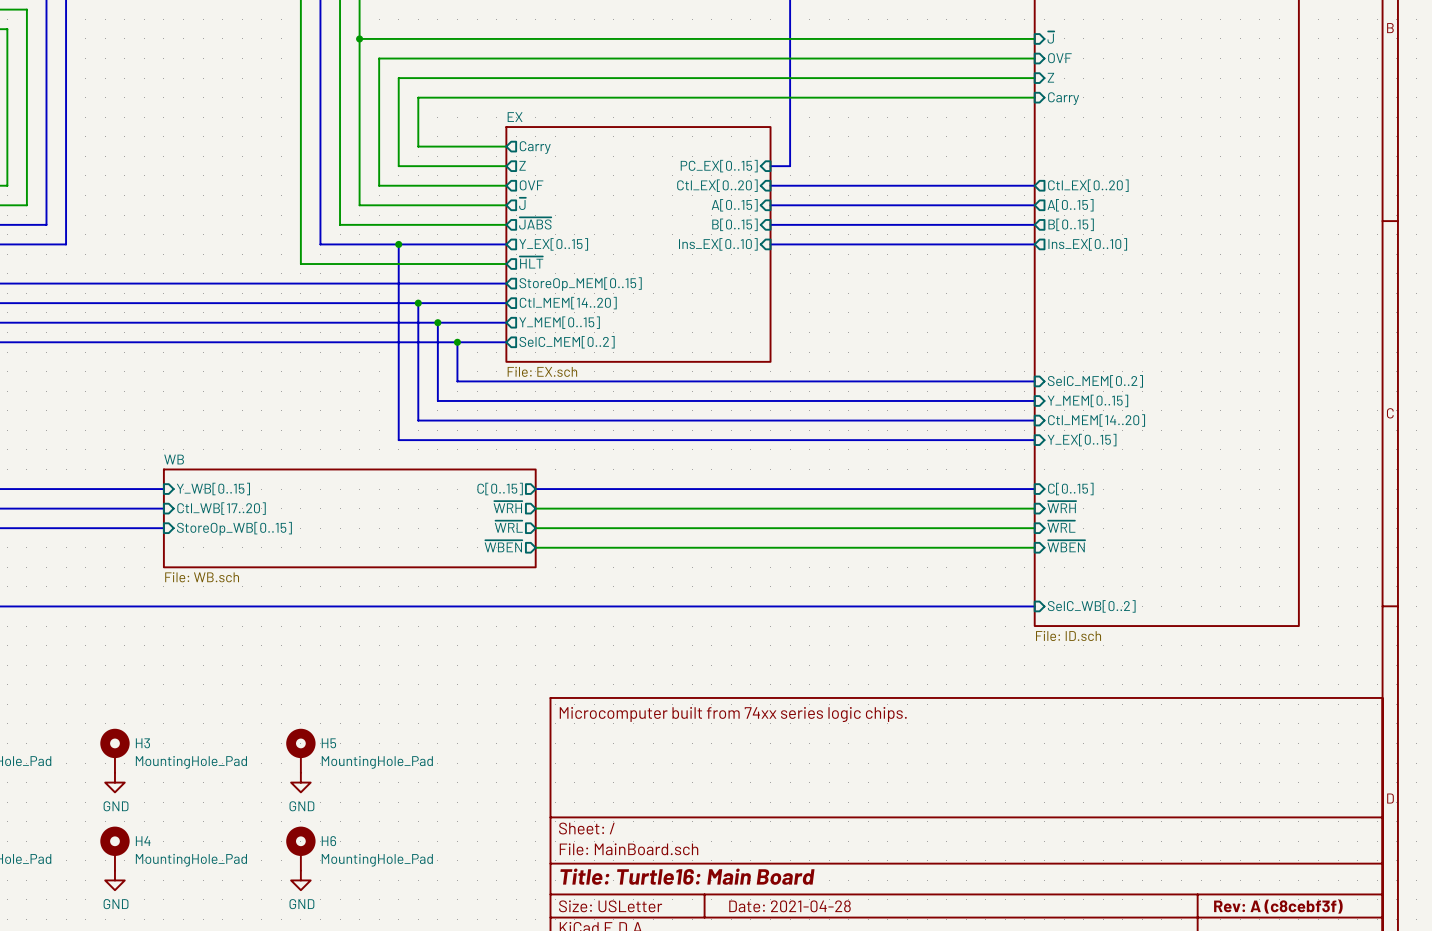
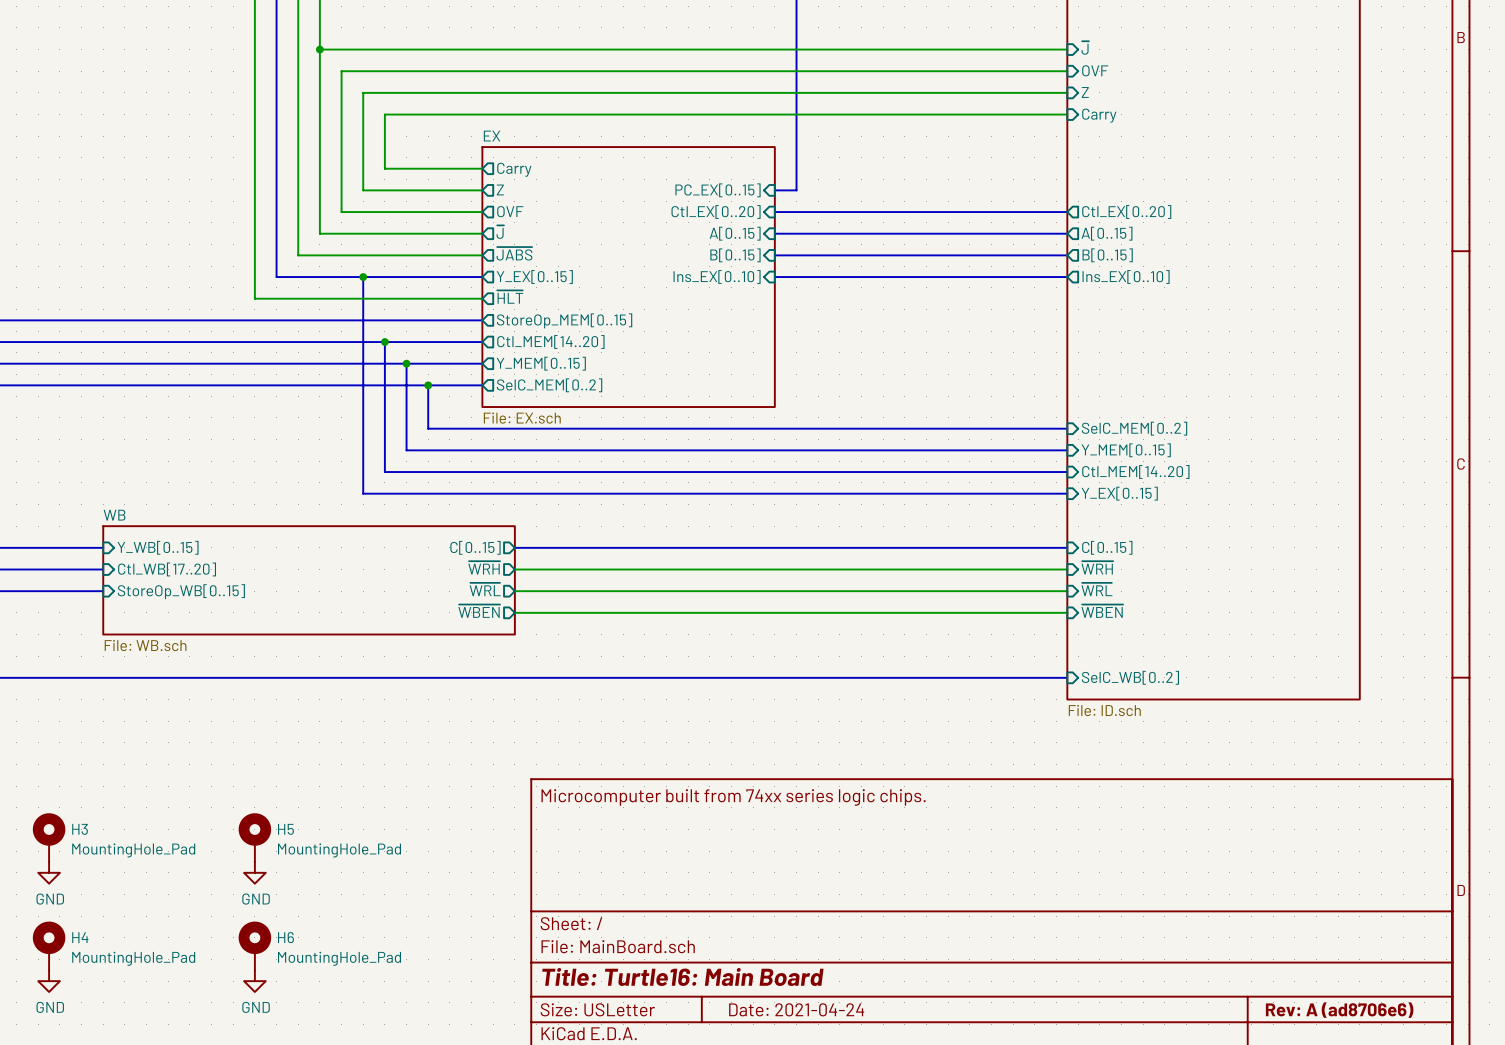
title block: Date: 2021-04-28 (789, 906) -> Date: 2021-04-24 (796, 1009)
title block: Rev: A (c8cebf3f) (1278, 906) -> Rev: A (ad8706e6) (1339, 1010)

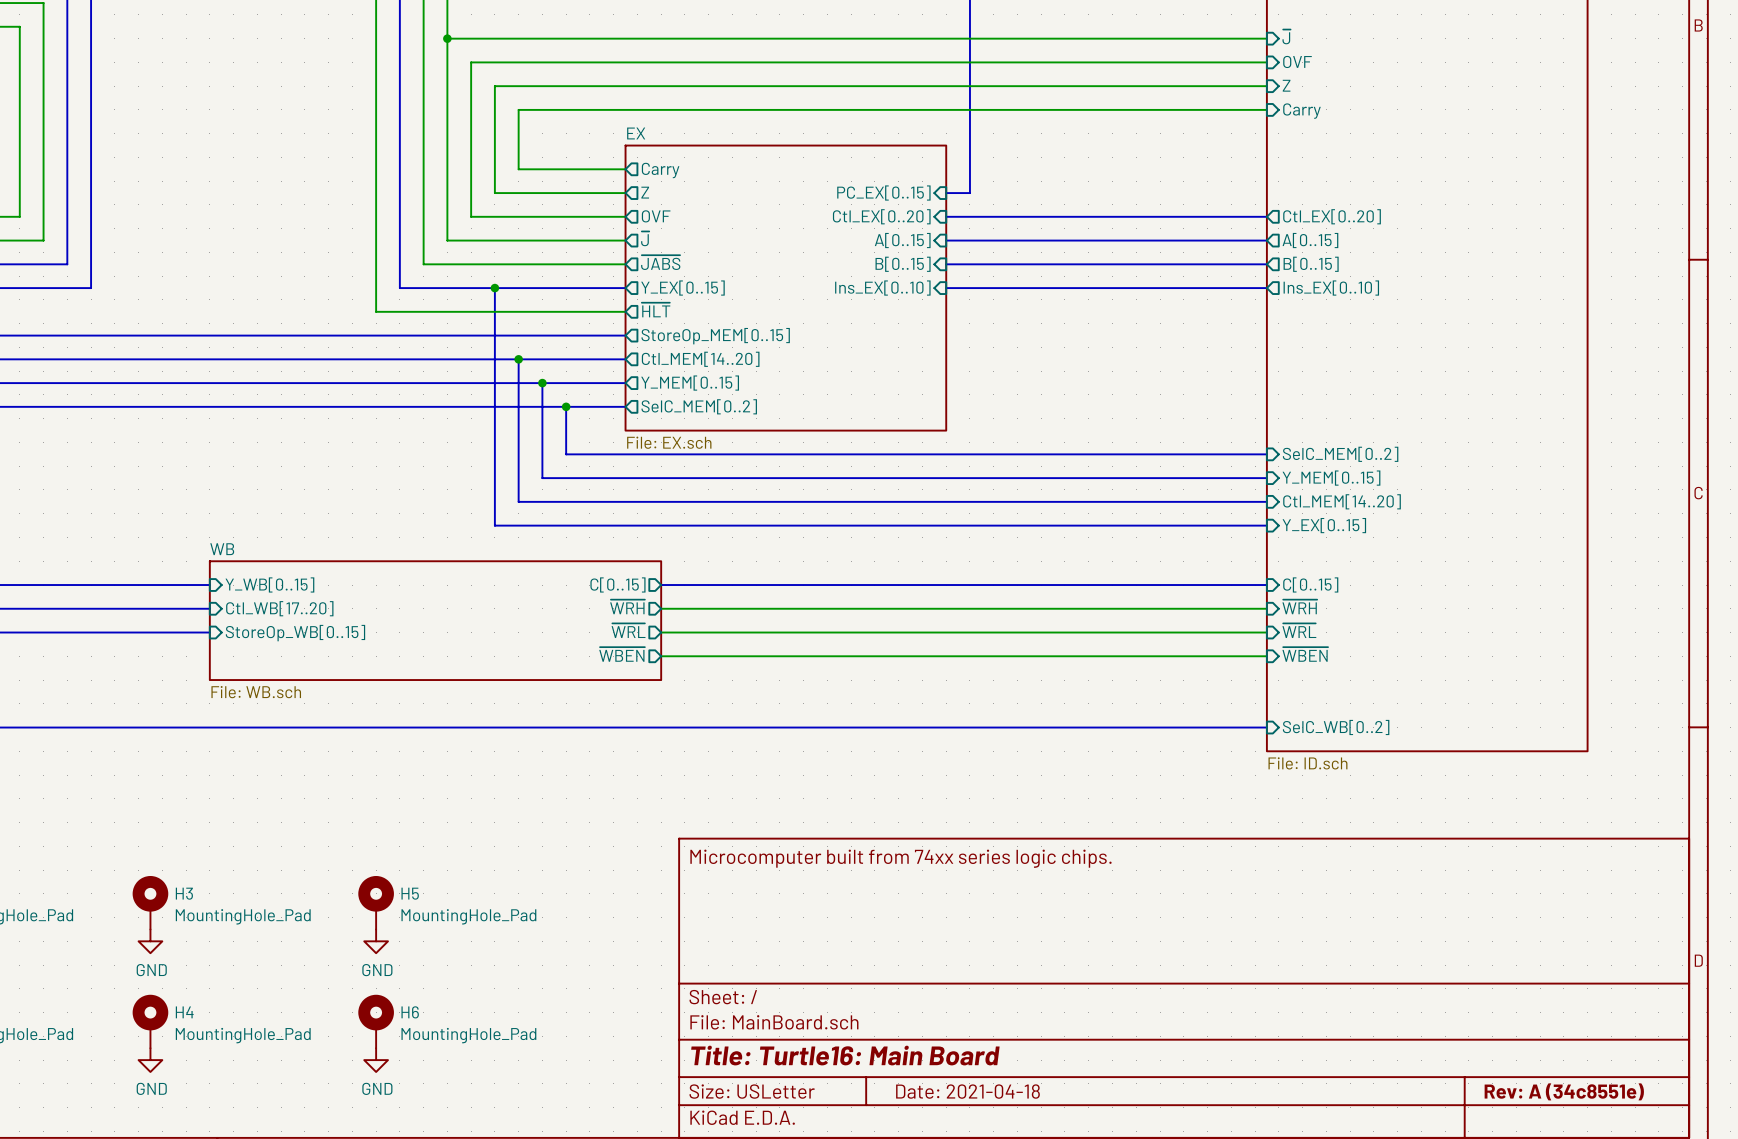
title block: Date: 2021-04-24 (796, 1009) -> Date: 2021-04-18 (967, 1091)
title block: Rev: A (ad8706e6) (1339, 1010) -> Rev: A (34c8551e) (1564, 1091)

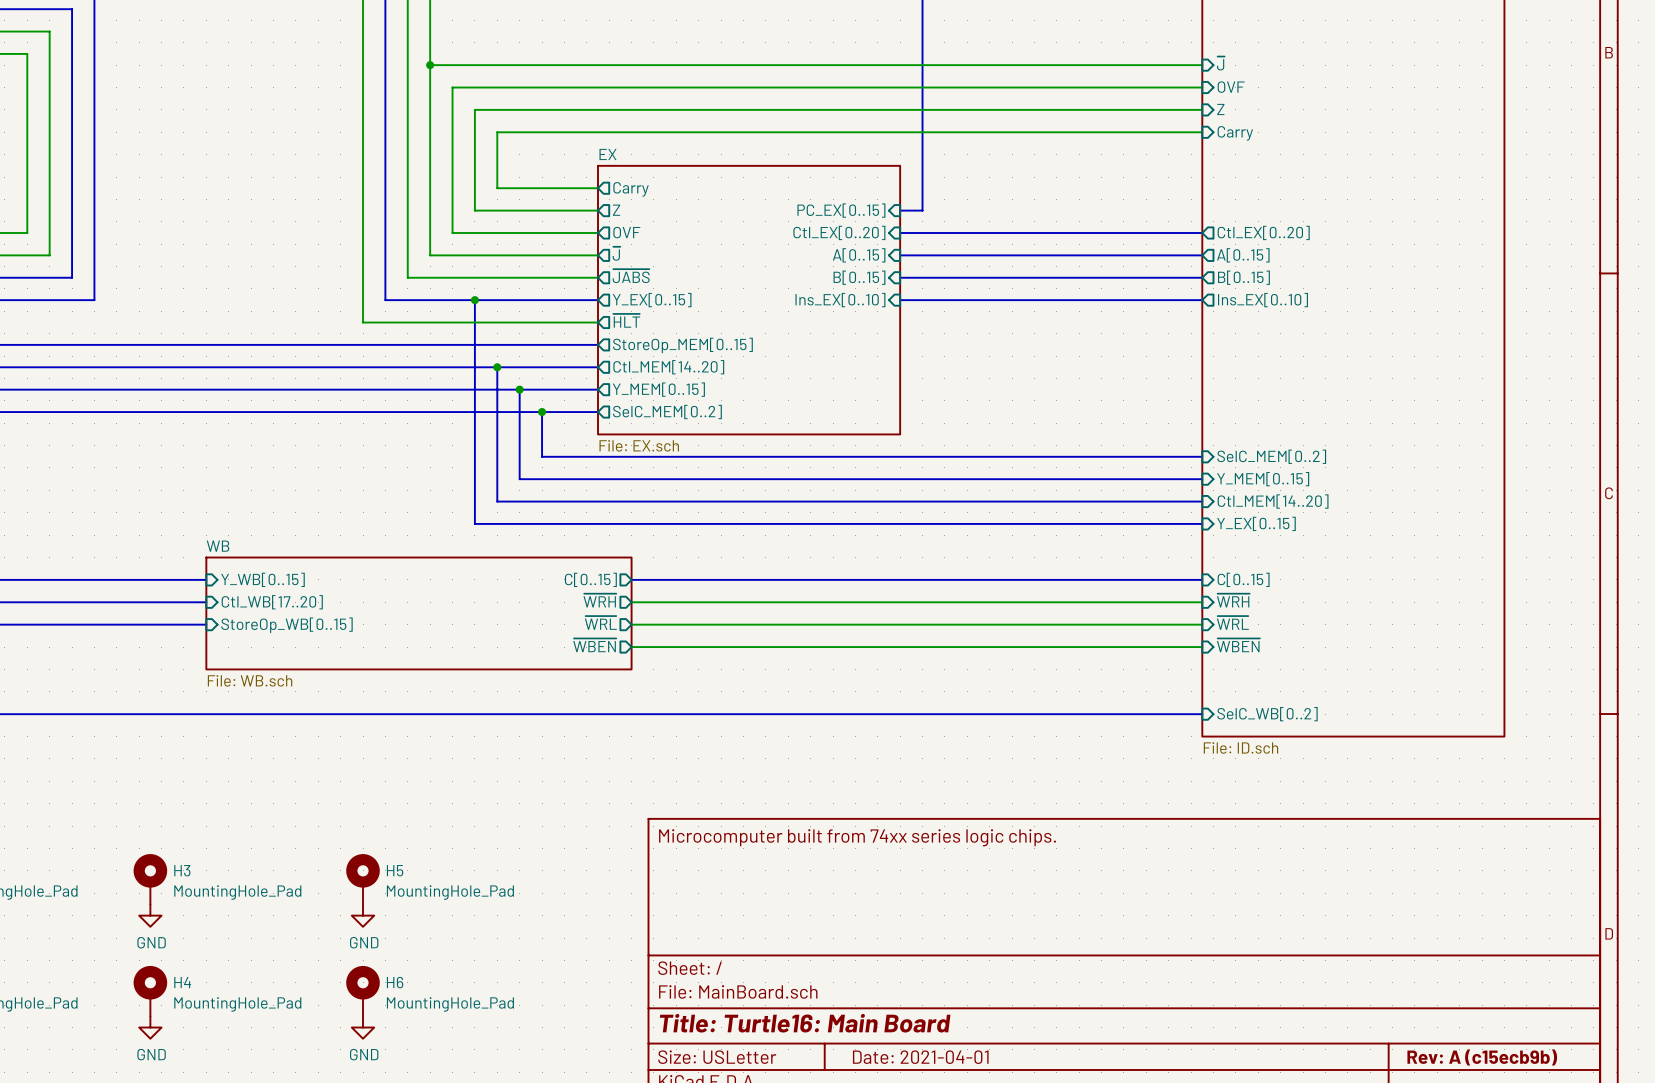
title block: Date: 2021-04-18 (967, 1091) -> Date: 2021-04-01 (920, 1057)
title block: Rev: A (34c8551e) (1564, 1091) -> Rev: A (c15ecb9b) (1482, 1057)

